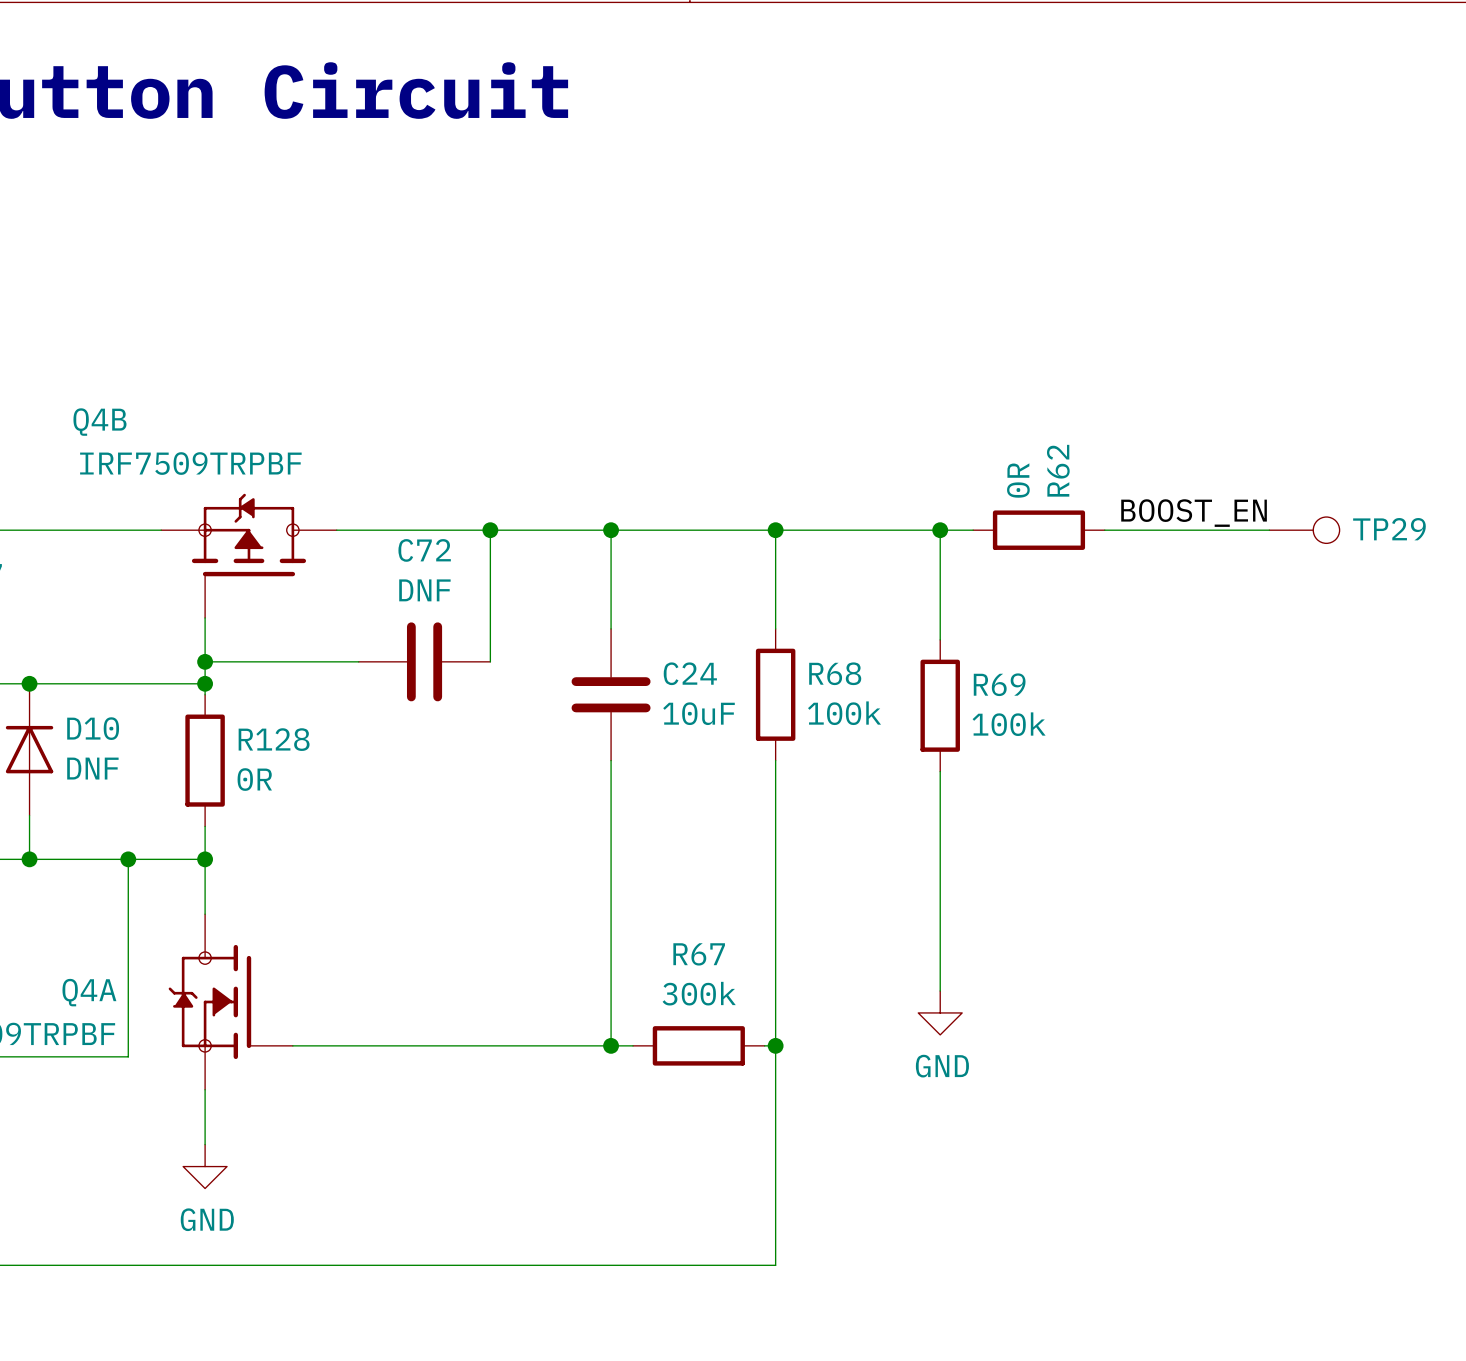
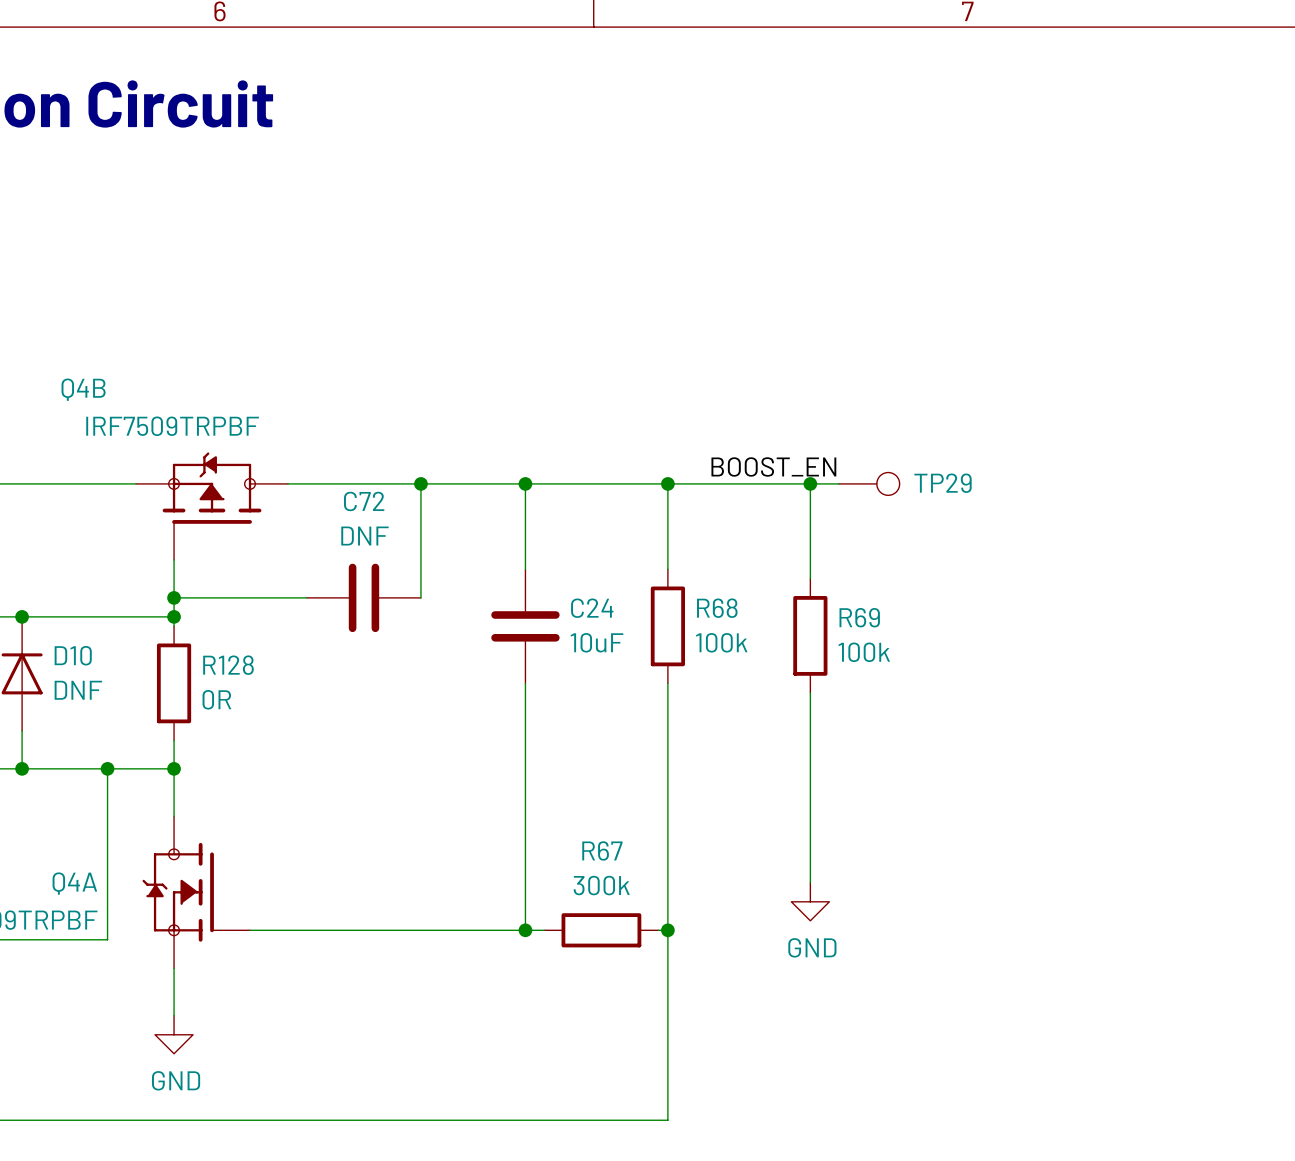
label position: BOOST_EN (1194, 513) -> BOOST_EN (773, 466)
R62: 0R (1038, 530) -> none
wire: (1104, 530) (1269, 530) -> none
TP29 position: (1304, 530) -> (869, 483)

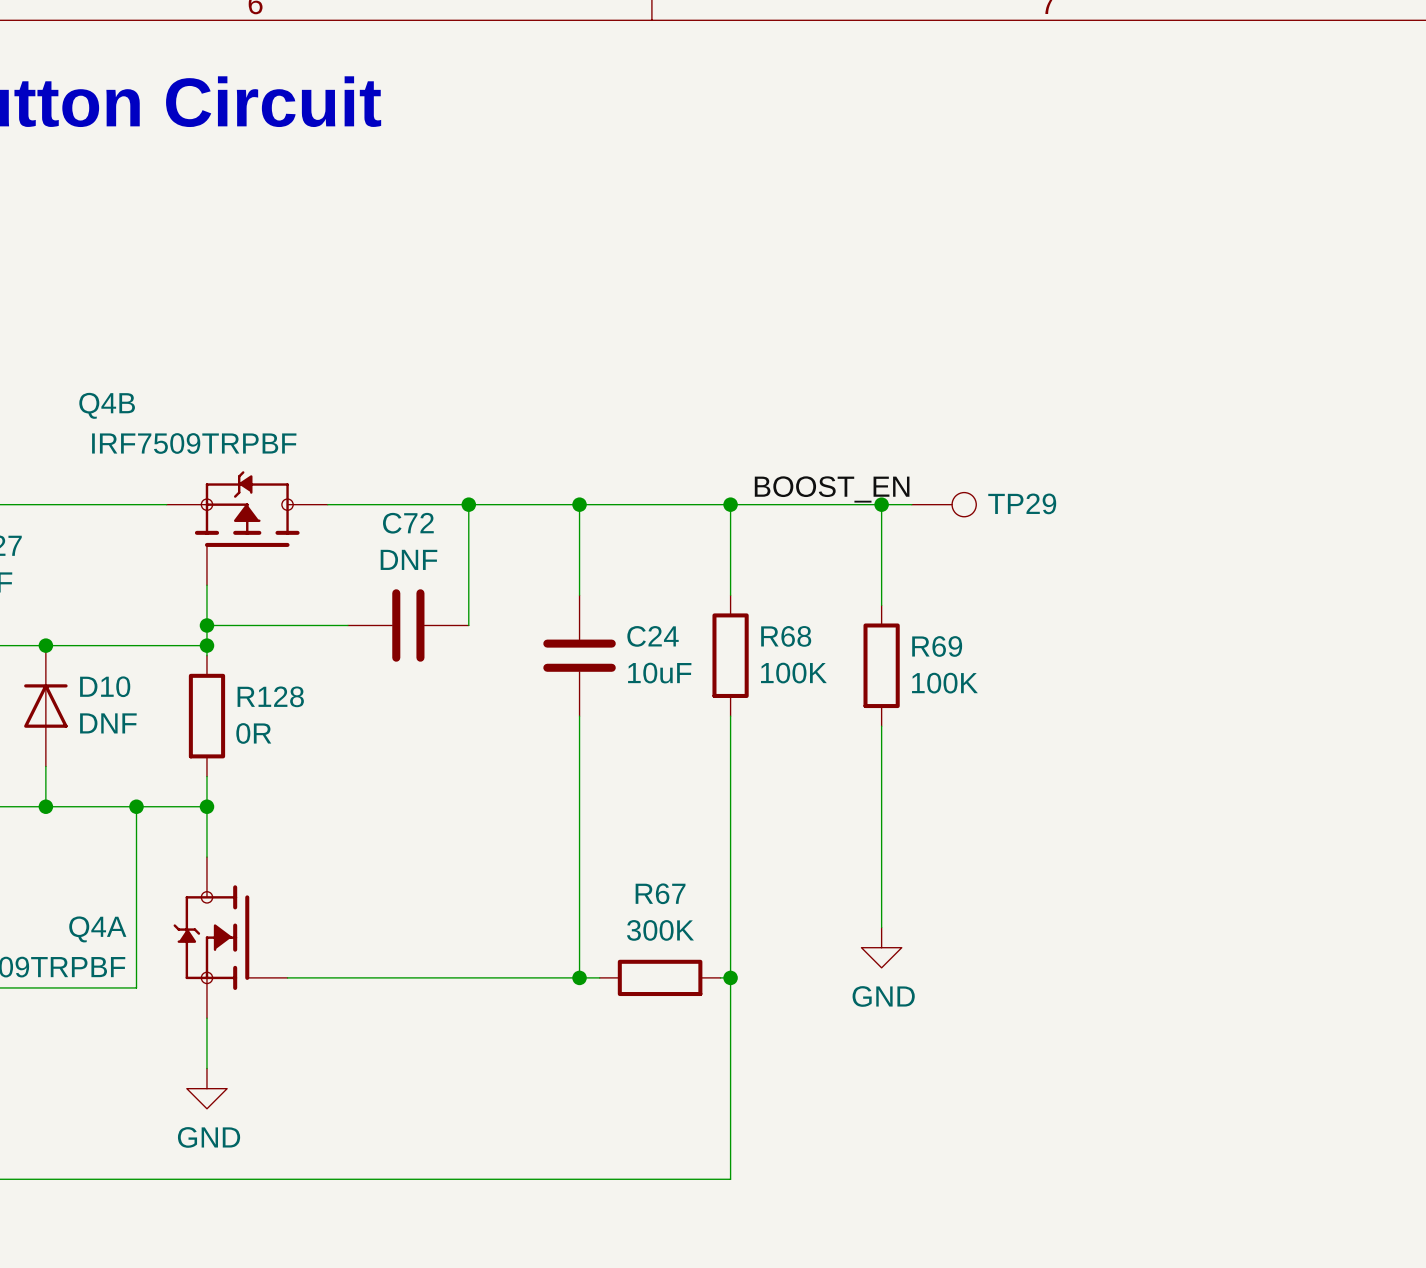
R68 value: 100k (721, 642) -> 100K (793, 673)
R69 value: 100k (864, 652) -> 100K (944, 683)
R67 value: 300k (601, 885) -> 300K (660, 930)

